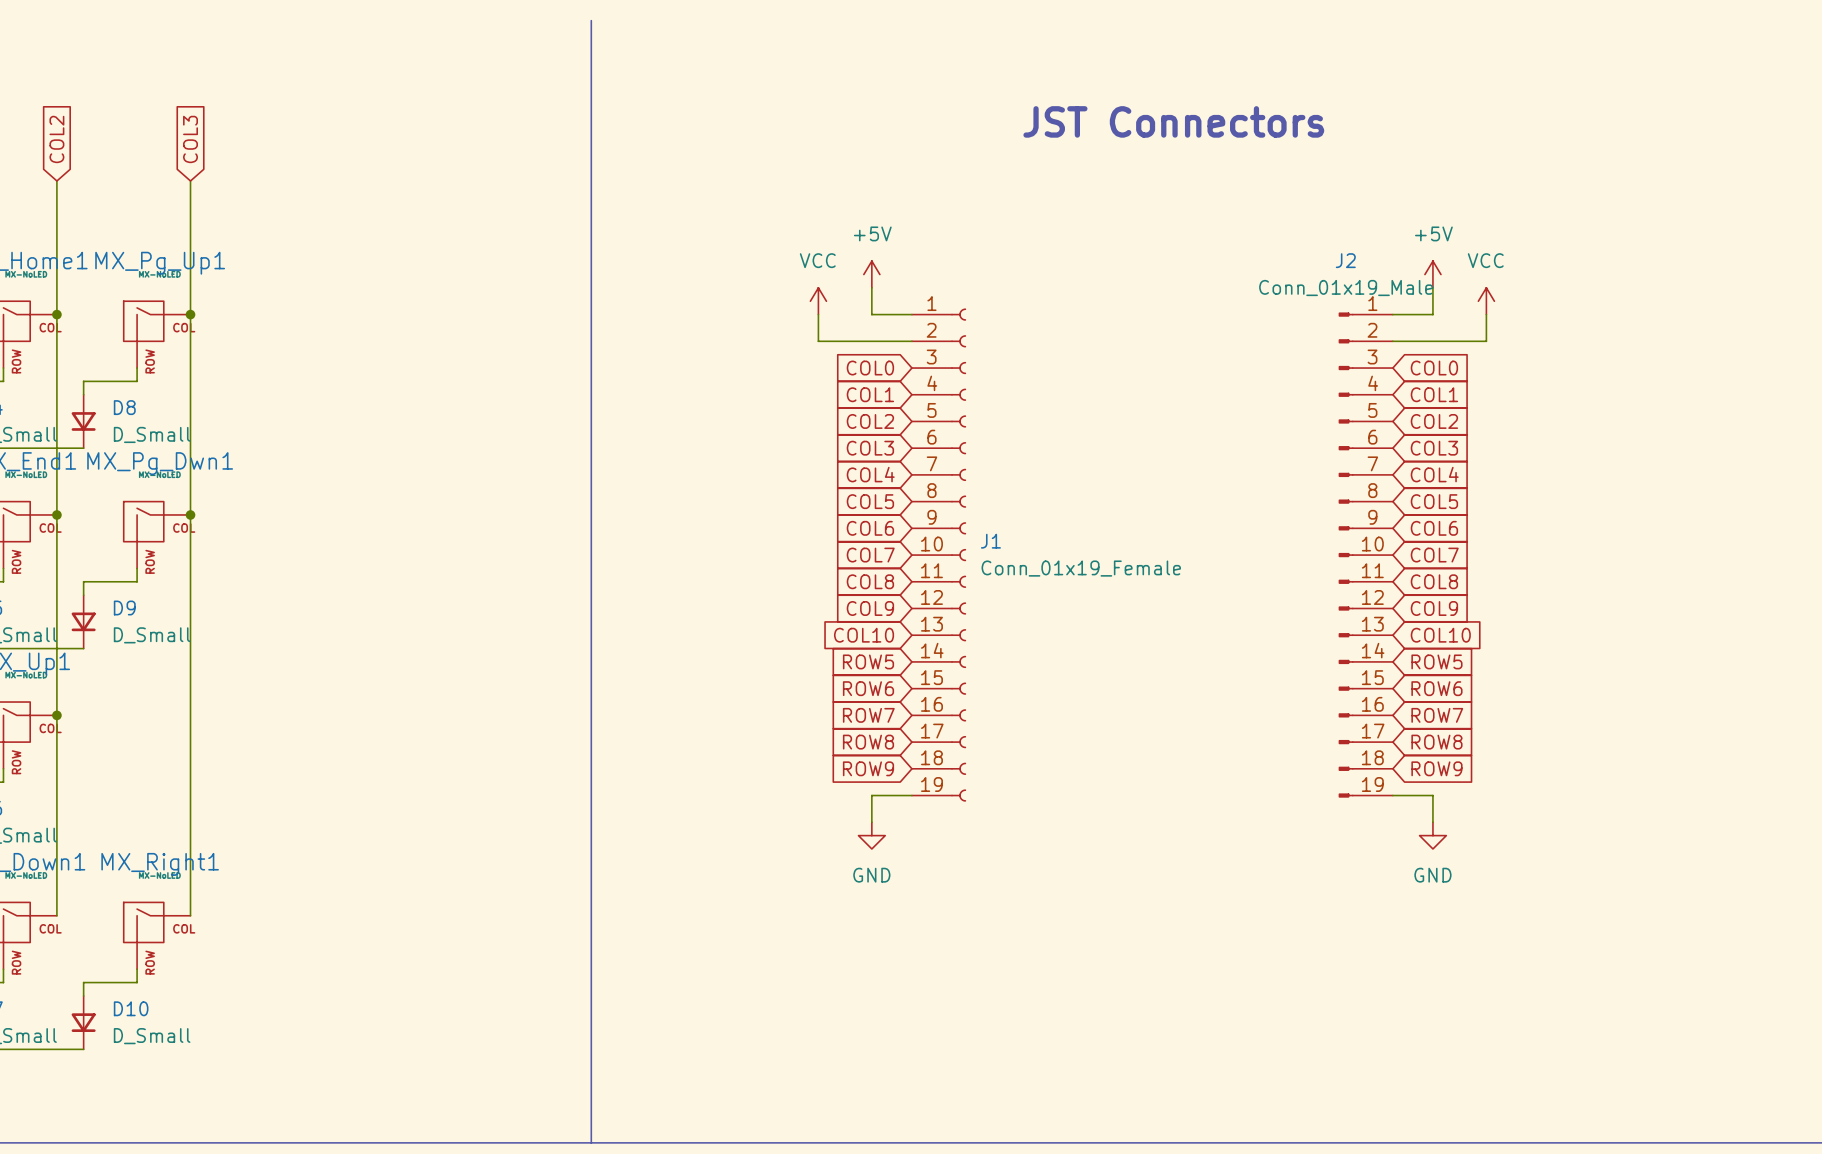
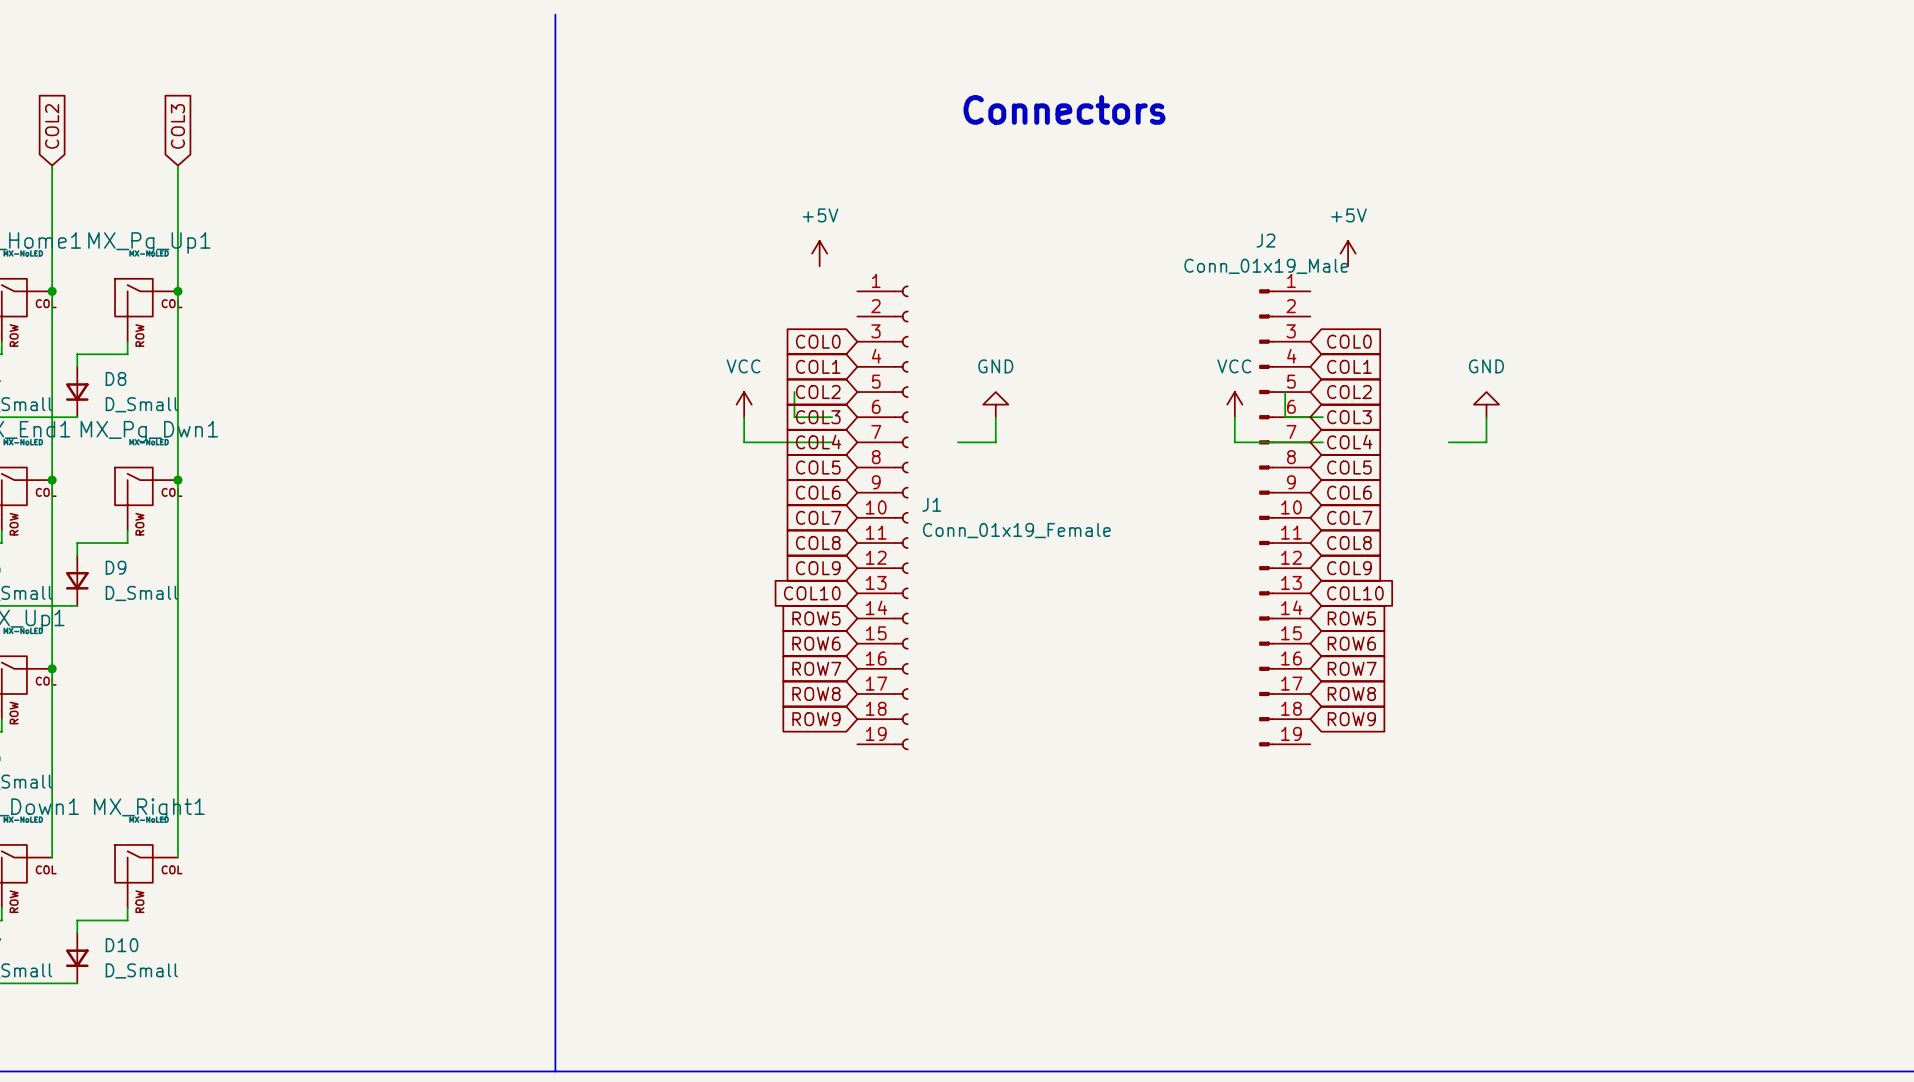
text: JST Connectors (1173, 121) -> Connectors (1064, 109)
wire: (871, 287) (871, 314) (911, 314) -> (794, 392) (794, 417) (832, 417)
wire: (1432, 287) (1432, 314) (1392, 314) -> (1486, 417) (1486, 442) (1448, 442)
power symbol position: VCC (818, 301) -> VCC (744, 404)
power symbol position: VCC (1486, 301) -> VCC (1234, 404)
wire: (818, 314) (818, 341) (911, 341) -> (744, 417) (744, 442) (832, 442)
wire: (1486, 314) (1486, 341) (1392, 341) -> none
wire: none -> (1285, 392) (1285, 417) (1322, 417)
power symbol: none -> GND (995, 404)
power symbol: none -> GND (1486, 404)
wire: none -> (995, 417) (995, 442) (958, 442)
wire: none -> (1234, 417) (1234, 442) (1322, 442)
wire: (911, 795) (871, 795) (871, 822) -> none
wire: (1392, 795) (1432, 795) (1432, 822) -> none
power symbol: GND (871, 835) -> none
power symbol: GND (1432, 835) -> none

